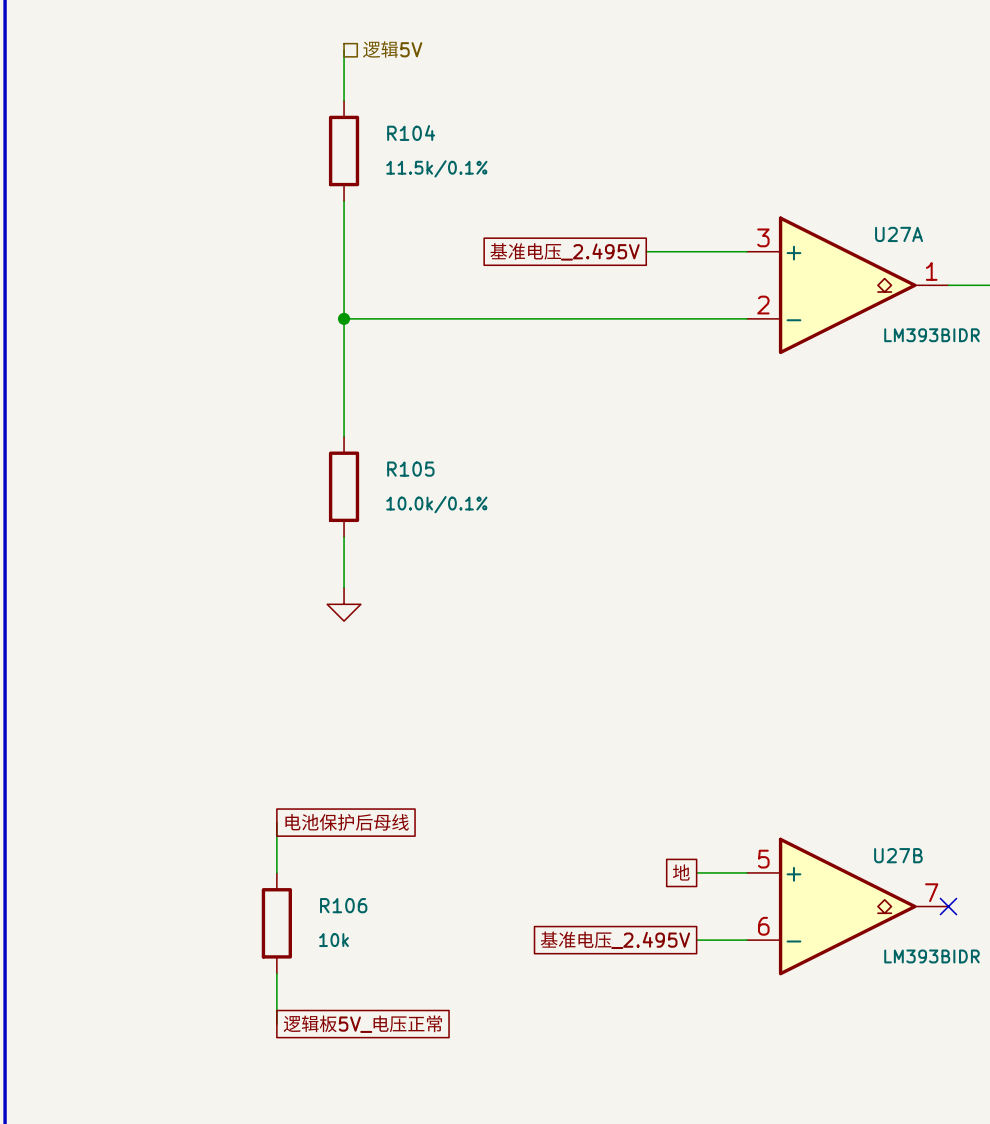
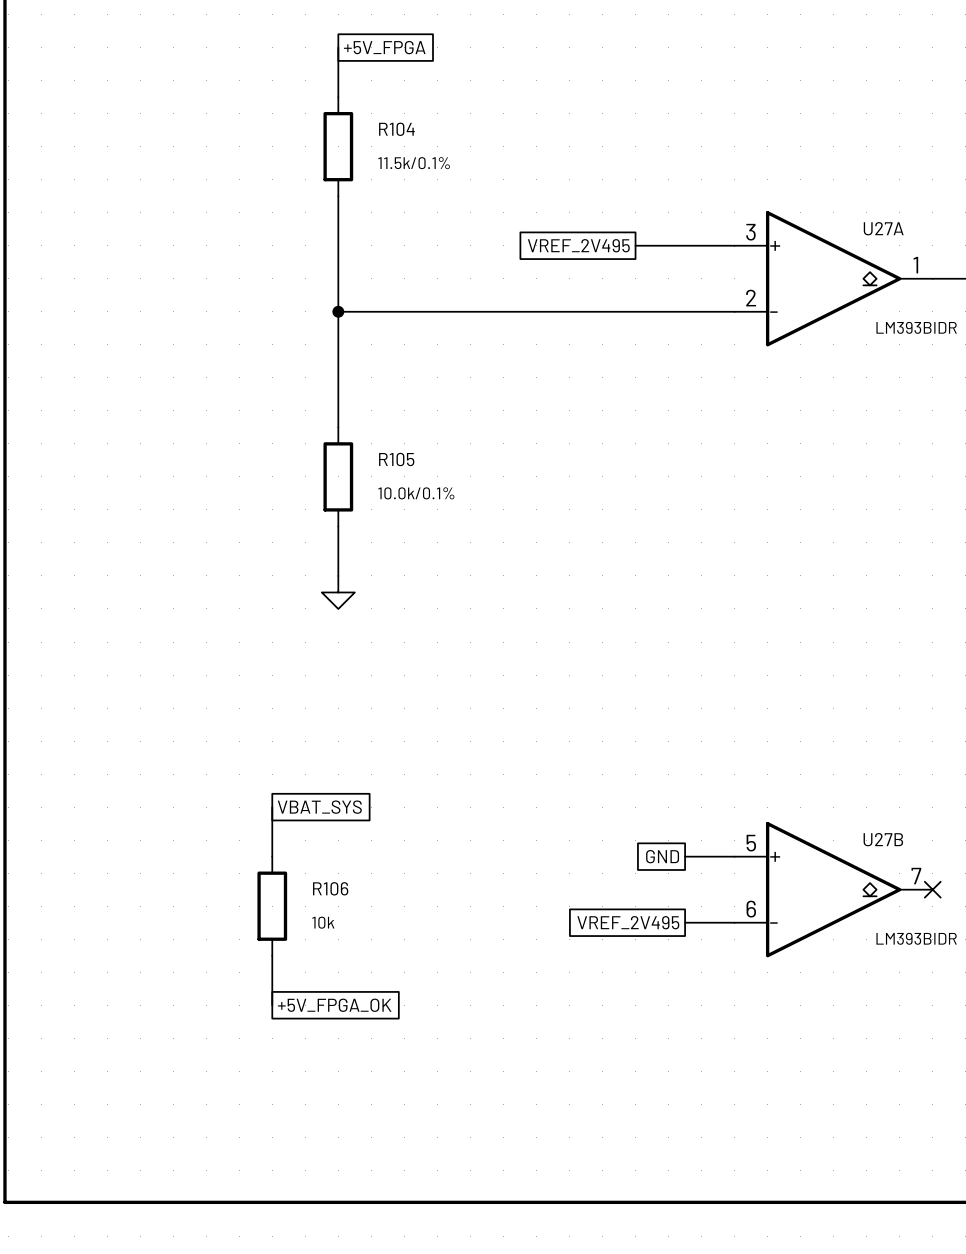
hierarchical label: 逻辑5V (392, 49) -> none
global label: none -> +5V_FPGA (384, 47)
global label: 基准电压_2.495V (564, 251) -> VREF_2V495 (578, 245)
global label: 电池保护后母线 (347, 822) -> VBAT_SYS (319, 807)
global label: 地 (681, 872) -> GND (662, 856)
global label: 基准电压_2.495V (614, 939) -> VREF_2V495 (628, 922)
global label: 逻辑板5V_电压正常 (362, 1023) -> +5V_FPGA_OK (334, 1005)

